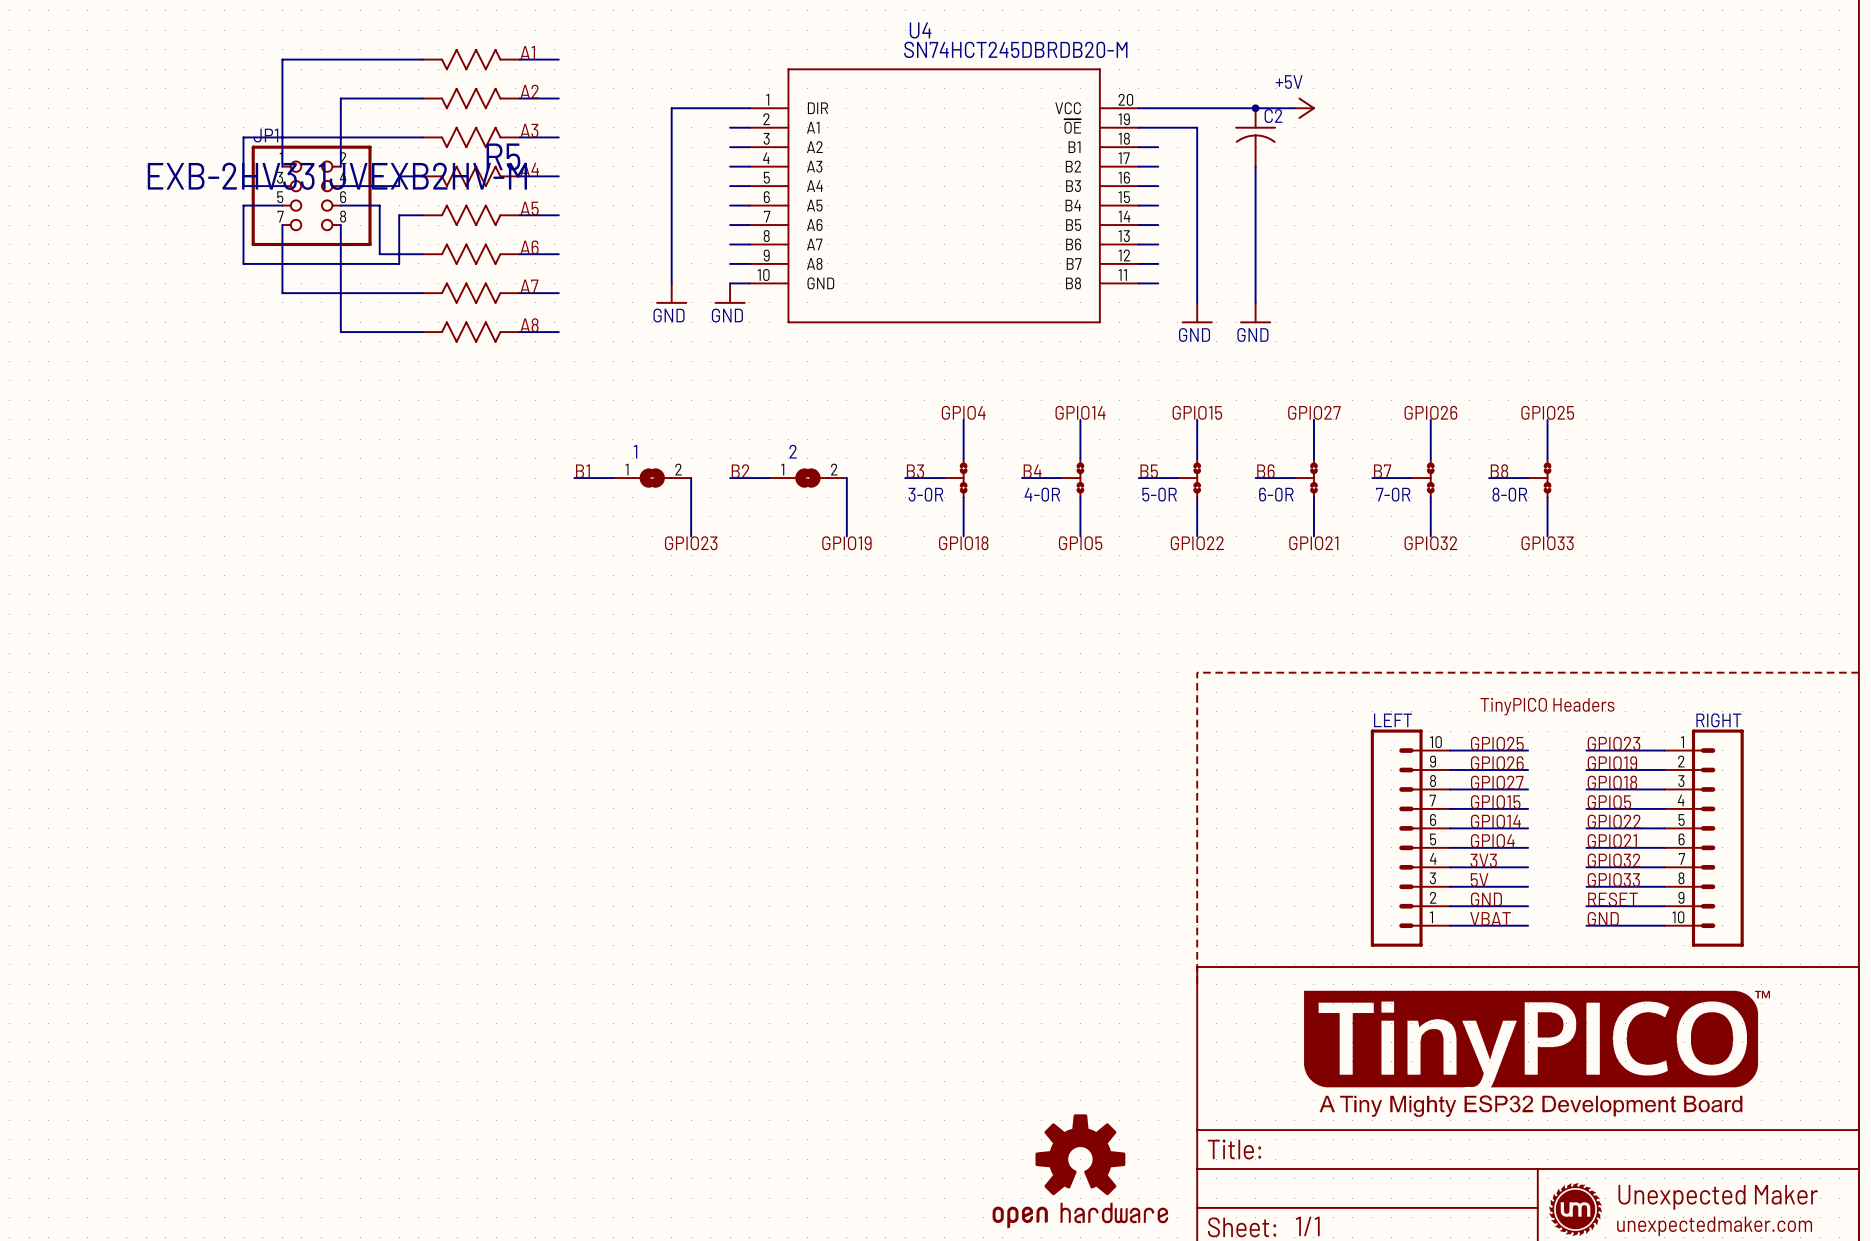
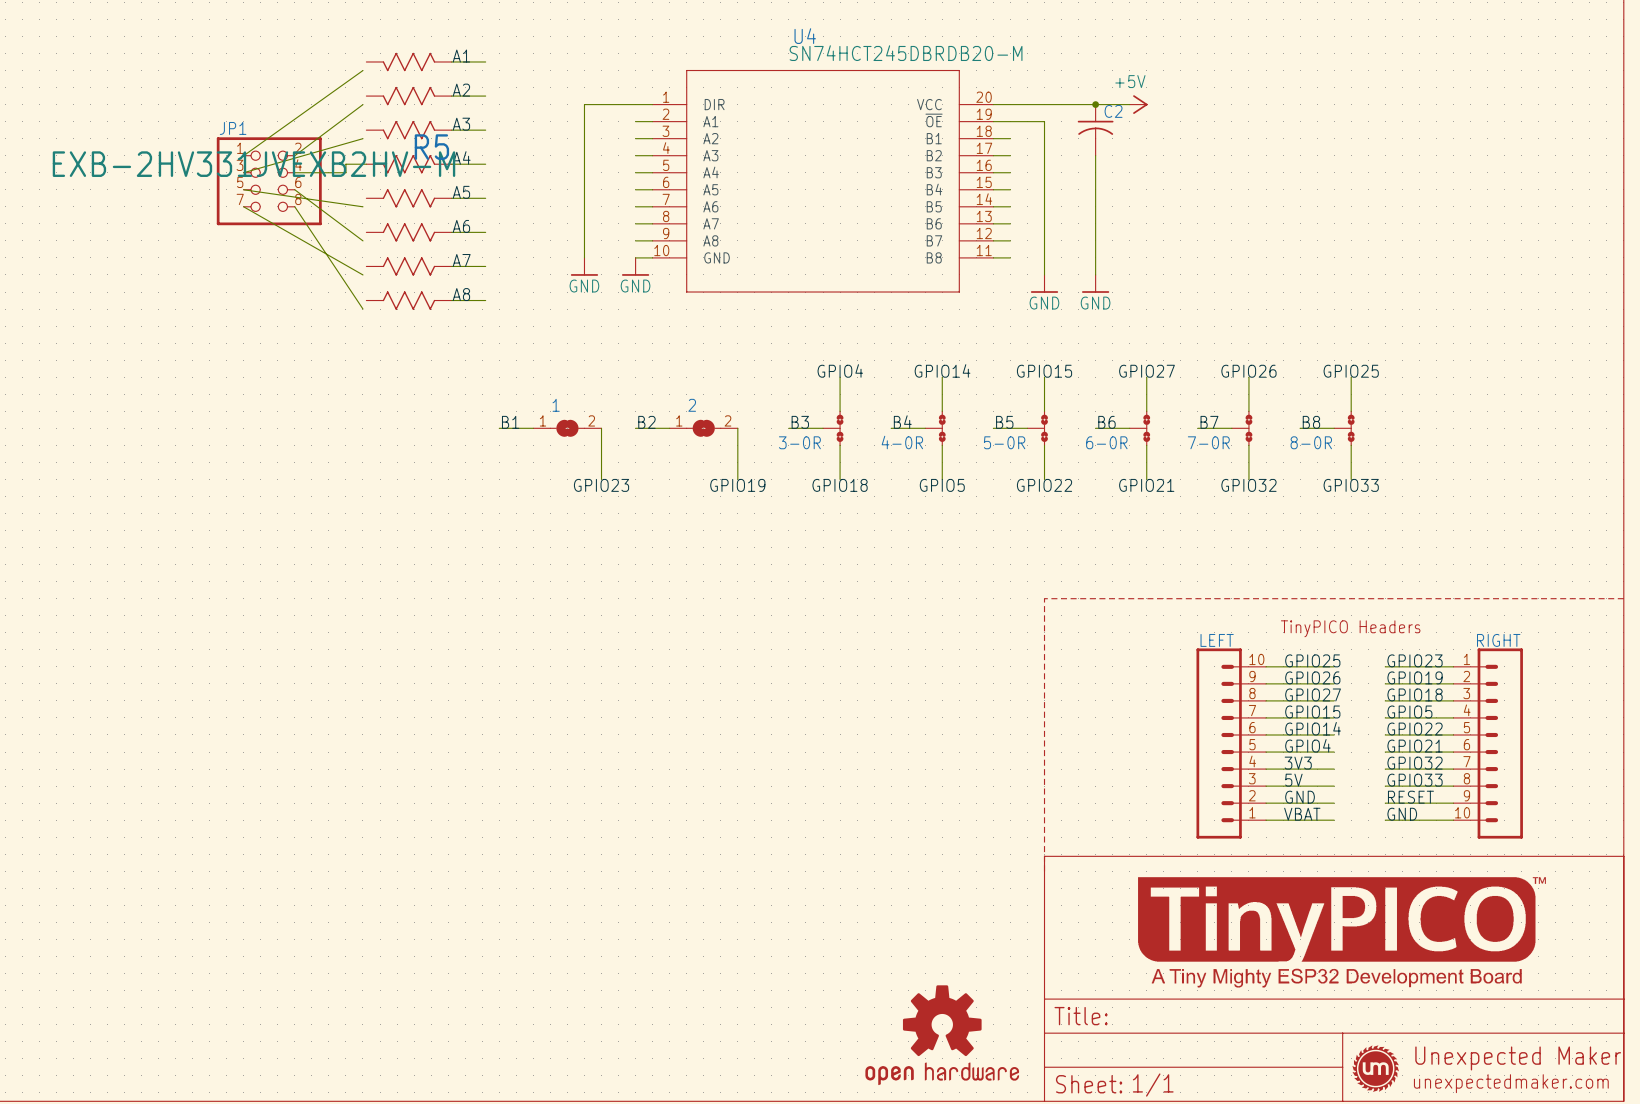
wire: (422, 59) (282, 59) (282, 166) -> (362, 70) (243, 155)
wire: (422, 98) (340, 98) (340, 166) -> (362, 104) (294, 155)
wire: (422, 137) (243, 137) (243, 186) (282, 186) -> (362, 138) (243, 172)
wire: (282, 205) (243, 205) (243, 263) (399, 263) (399, 215) (422, 215) -> (243, 189) (362, 206)
wire: (340, 205) (379, 205) (379, 254) (422, 254) -> (294, 189) (362, 240)
wire: (282, 225) (282, 293) (422, 293) -> (243, 206) (362, 274)
wire: (340, 225) (340, 332) (422, 332) -> (294, 206) (362, 309)

